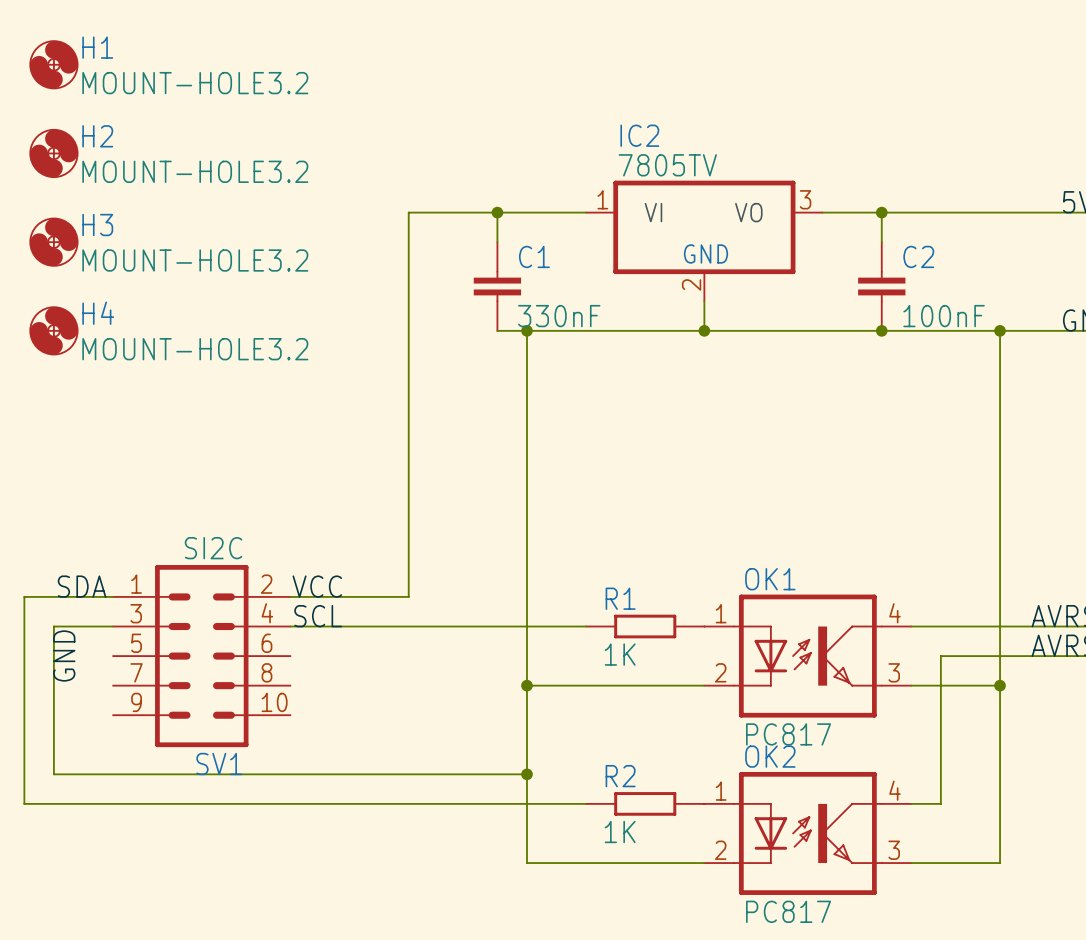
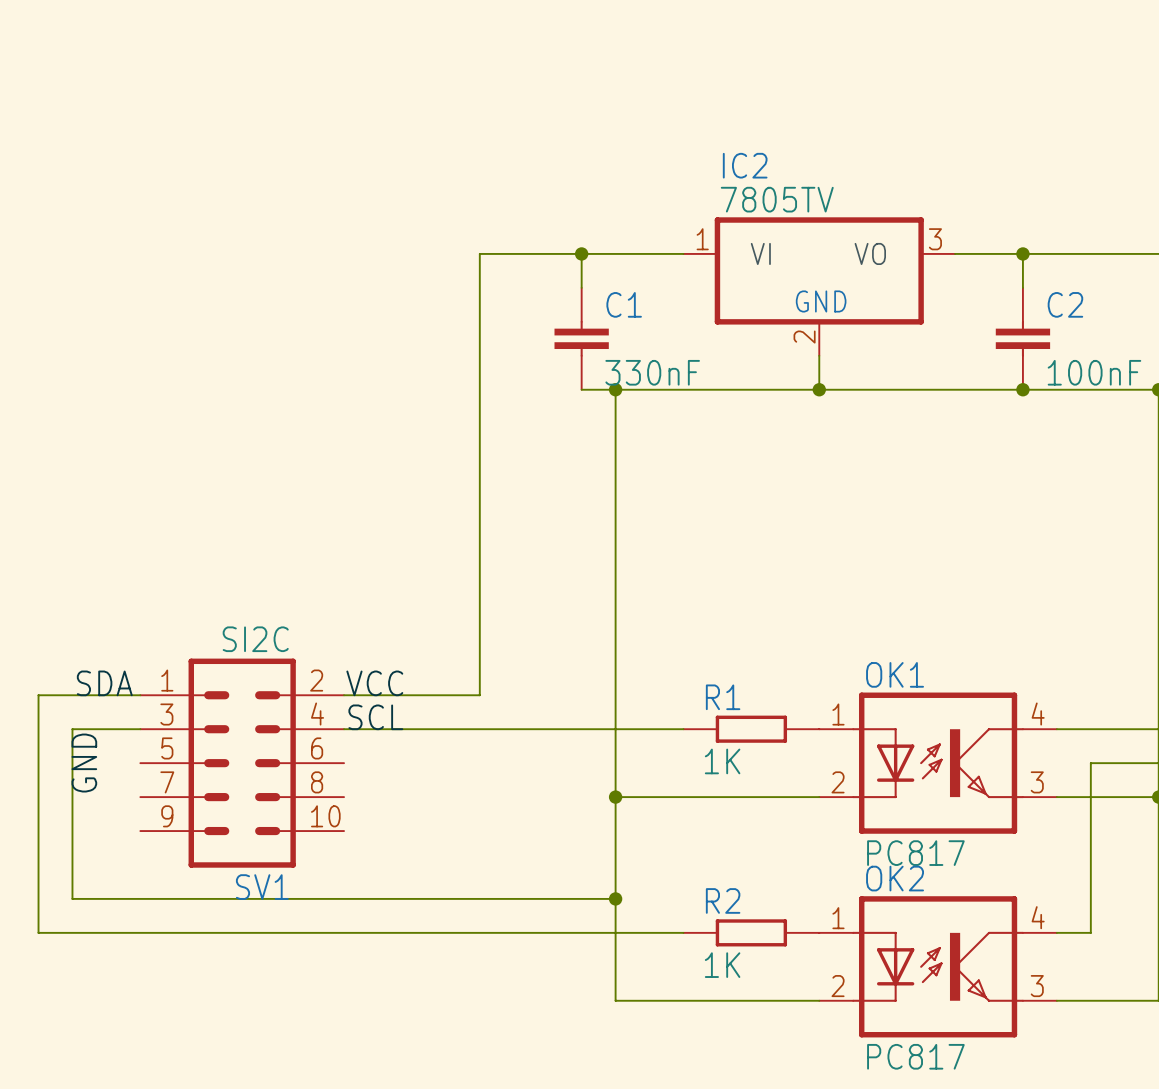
H1: MOUNT-HOLE3.2 (53, 64) -> none
H2: MOUNT-HOLE3.2 (53, 153) -> none
H3: MOUNT-HOLE3.2 (53, 242) -> none
H4: MOUNT-HOLE3.2 (53, 330) -> none

